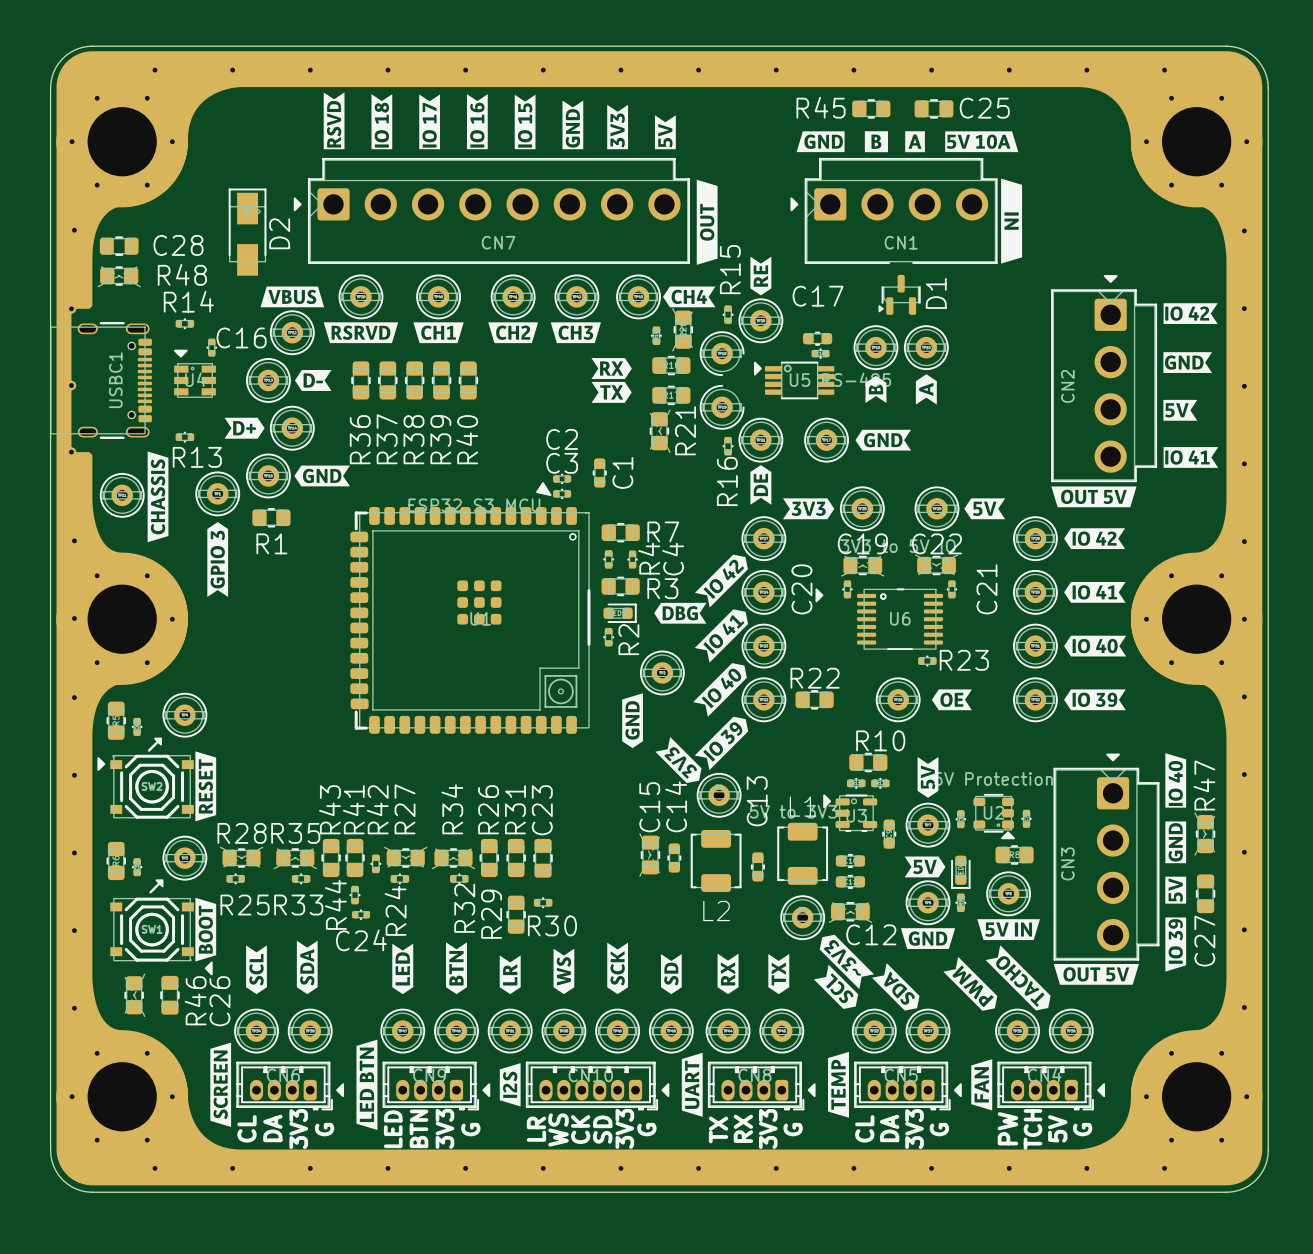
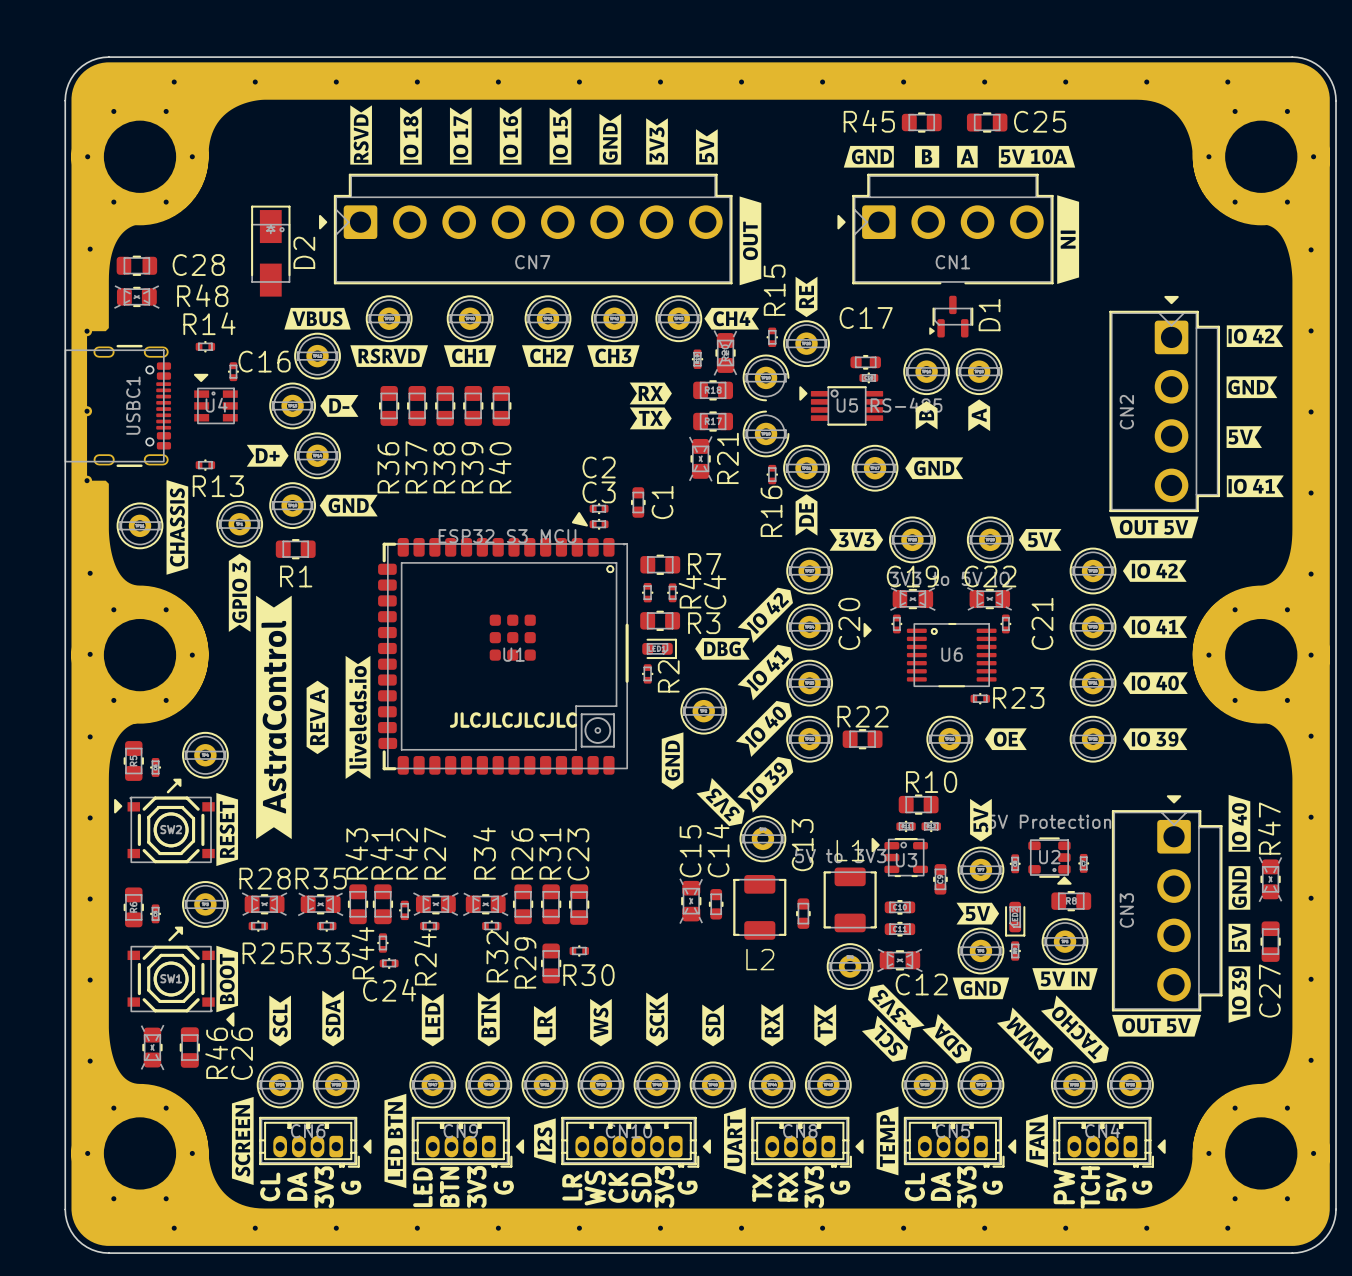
drawing: none -> [256, 595, 329, 840]
drawing: none -> [345, 655, 371, 779]
text: none -> JLCJLCJLCJLC (513, 720)

